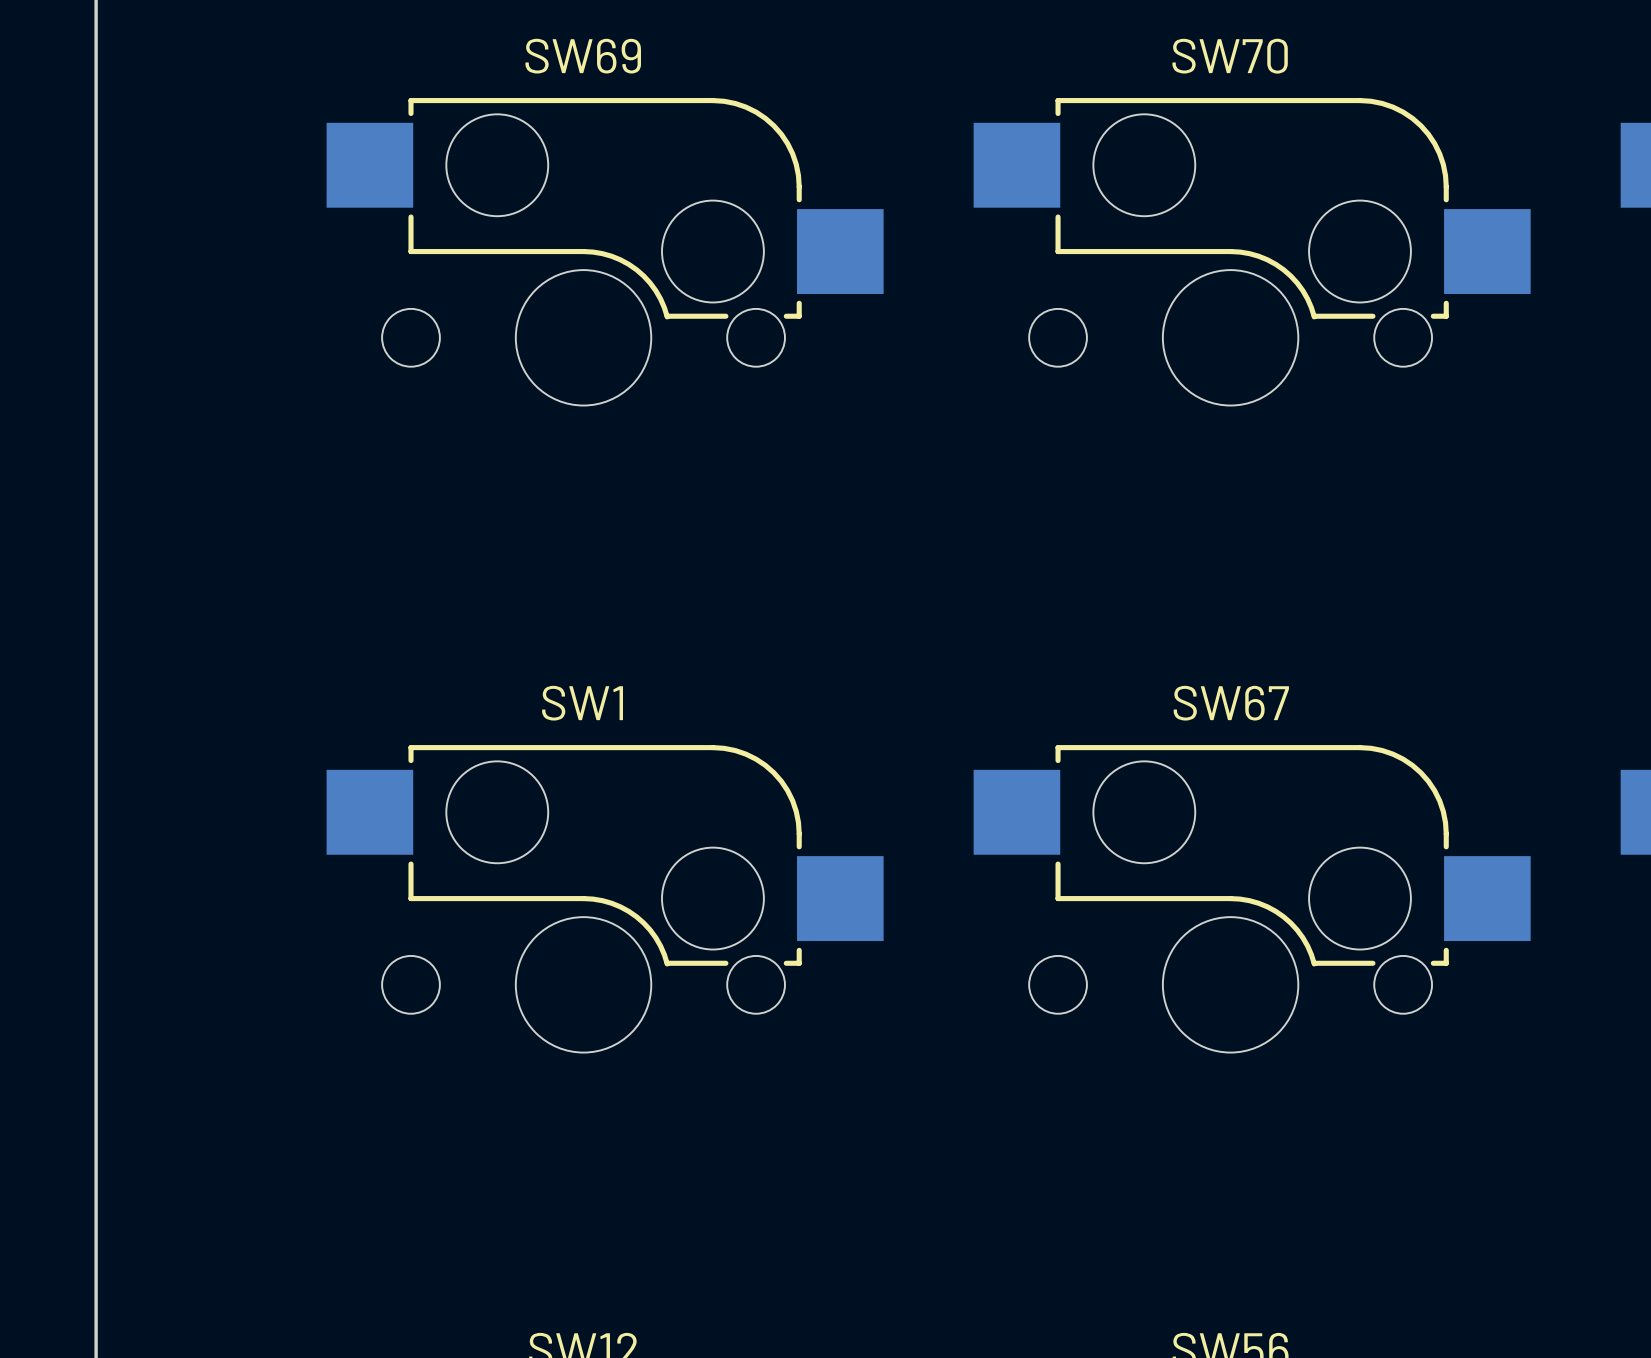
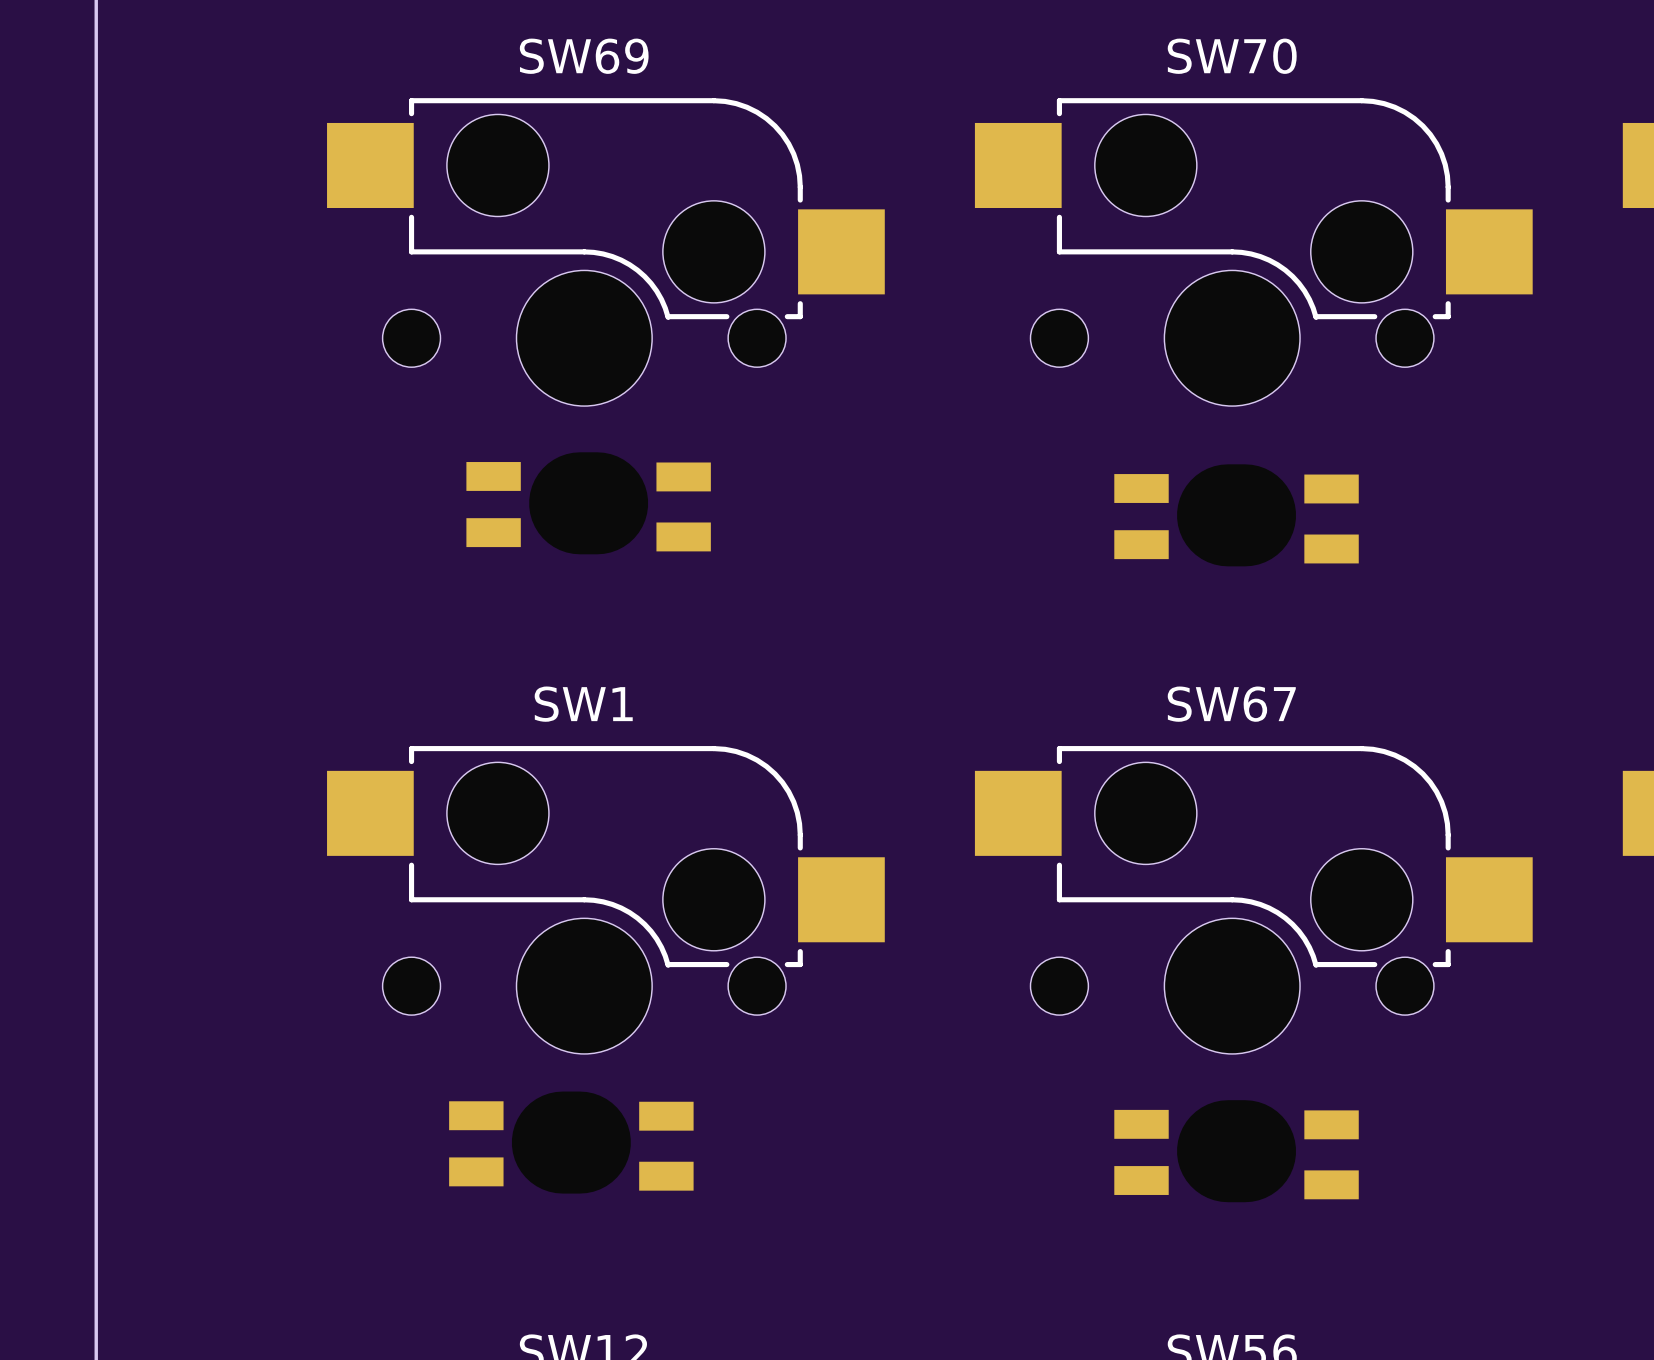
part: none -> (588, 503)
part: none -> (1236, 515)
part: none -> (571, 1142)
part: none -> (1236, 1151)

